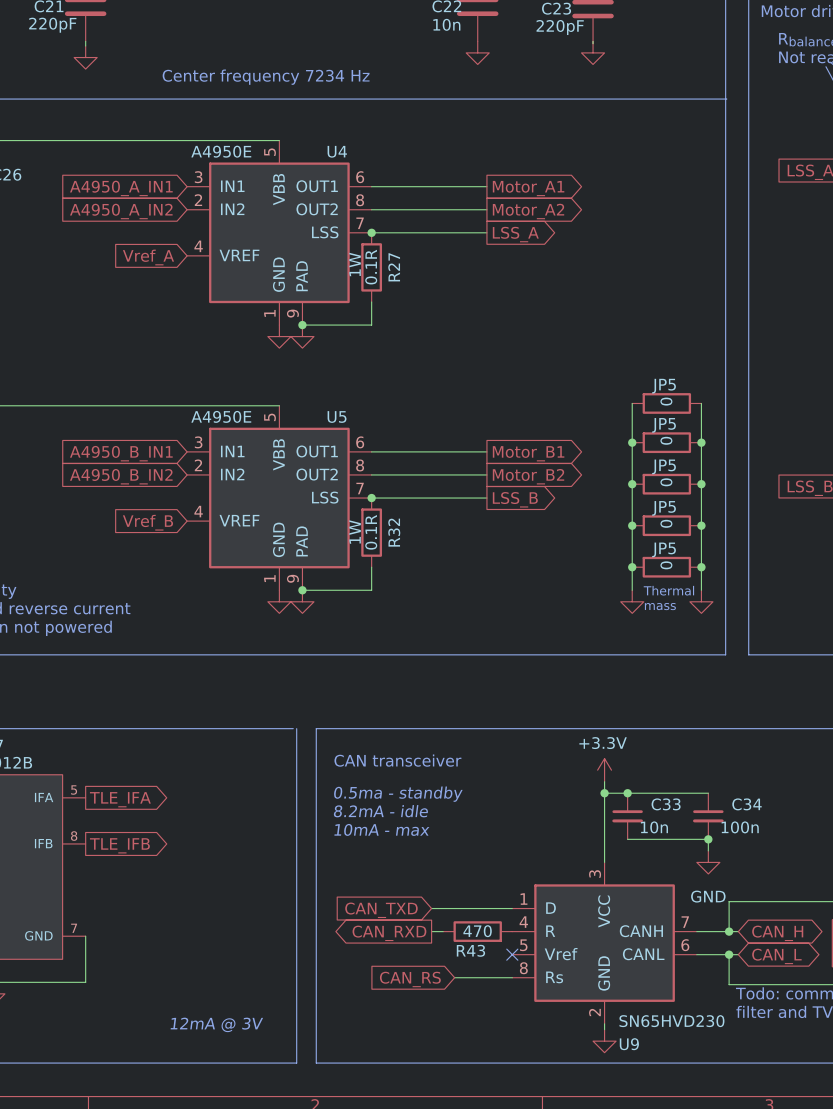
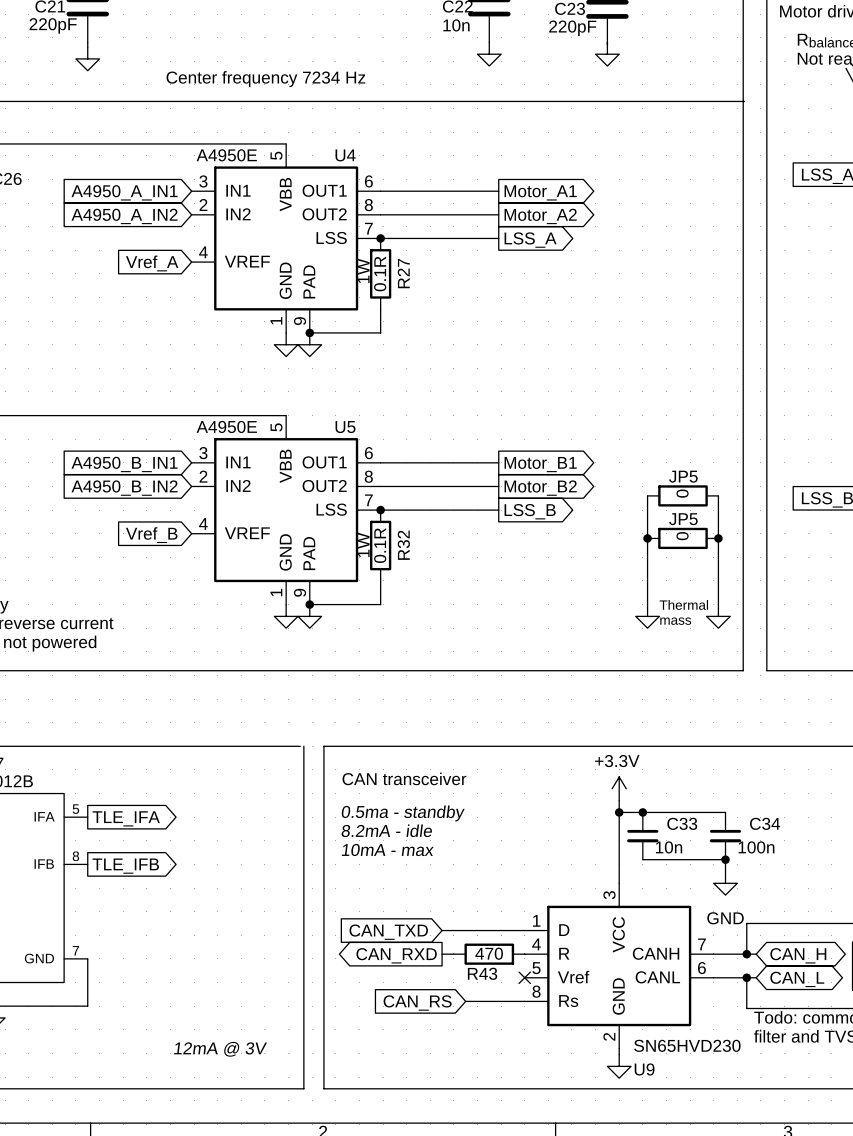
wire: (632, 403) (632, 484) -> none
JP5: 0 (666, 403) -> none
wire: (701, 403) (701, 484) -> none
junction: (632, 442) -> none
JP5: 0 (666, 442) -> none
junction: (701, 442) -> none
junction: (632, 484) -> none
junction: (701, 484) -> none
junction: (632, 567) -> none
JP5: 0 (666, 567) -> none
junction: (701, 567) -> none

